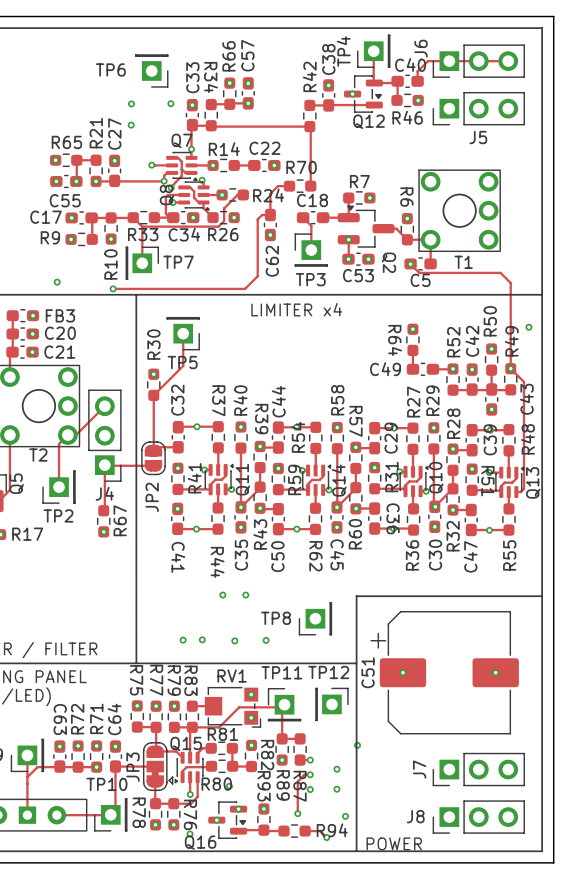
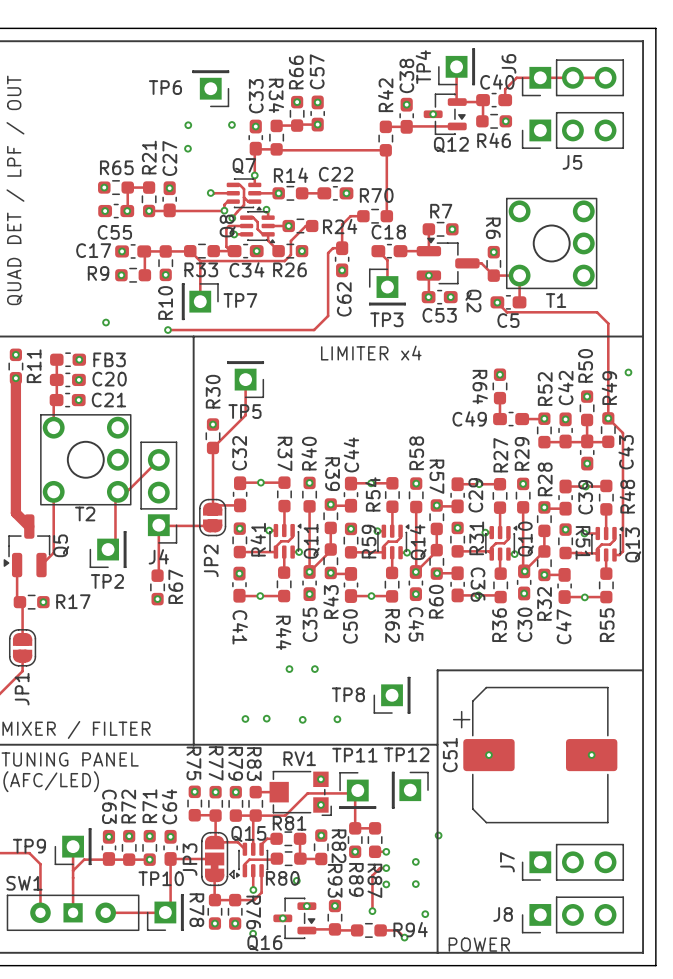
track: none -> (115, 489) (115, 542)
track: (67, 435) (59, 443) (59, 487) -> none

